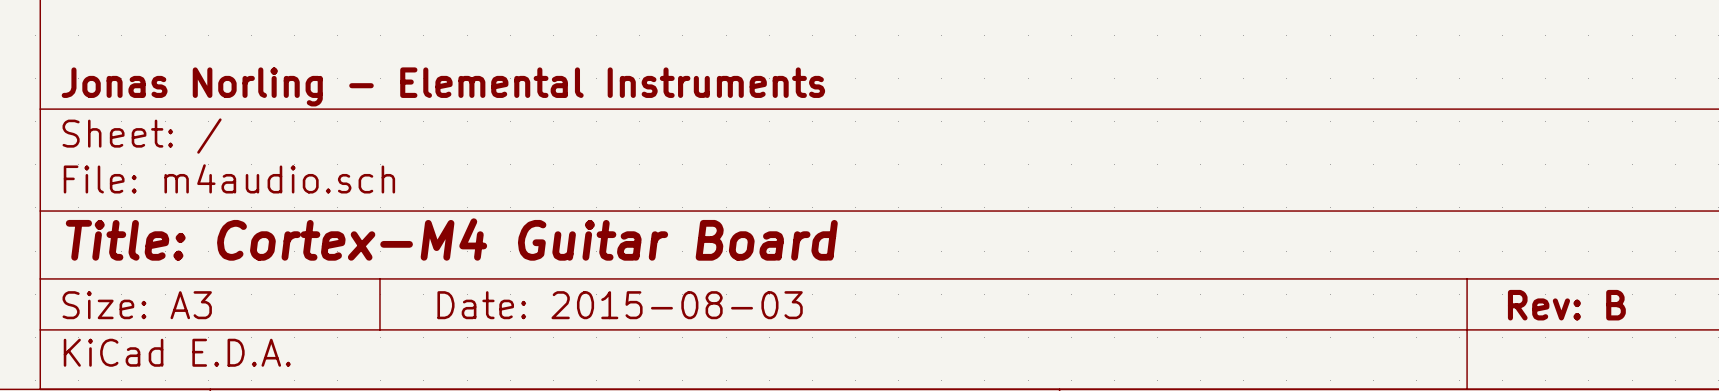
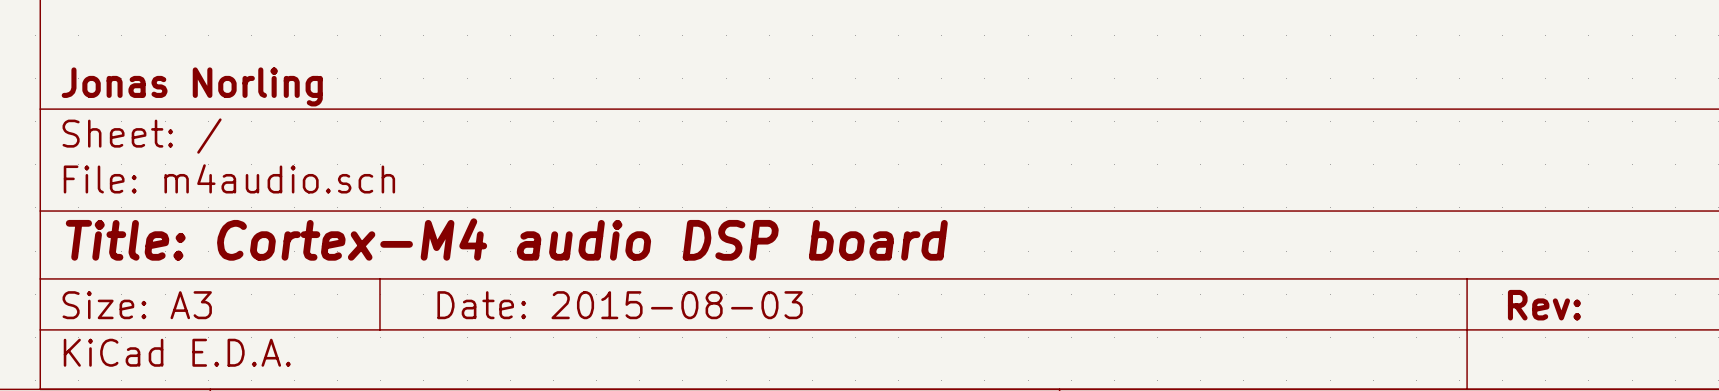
title block: Jonas Norling - Elemental Instruments (443, 86) -> Jonas Norling (192, 86)
title block: Title: Cortex-M4 Guitar Board (451, 239) -> Title: Cortex-M4 audio DSP board (506, 239)
title block: Rev: B (1566, 305) -> Rev: (1544, 305)

